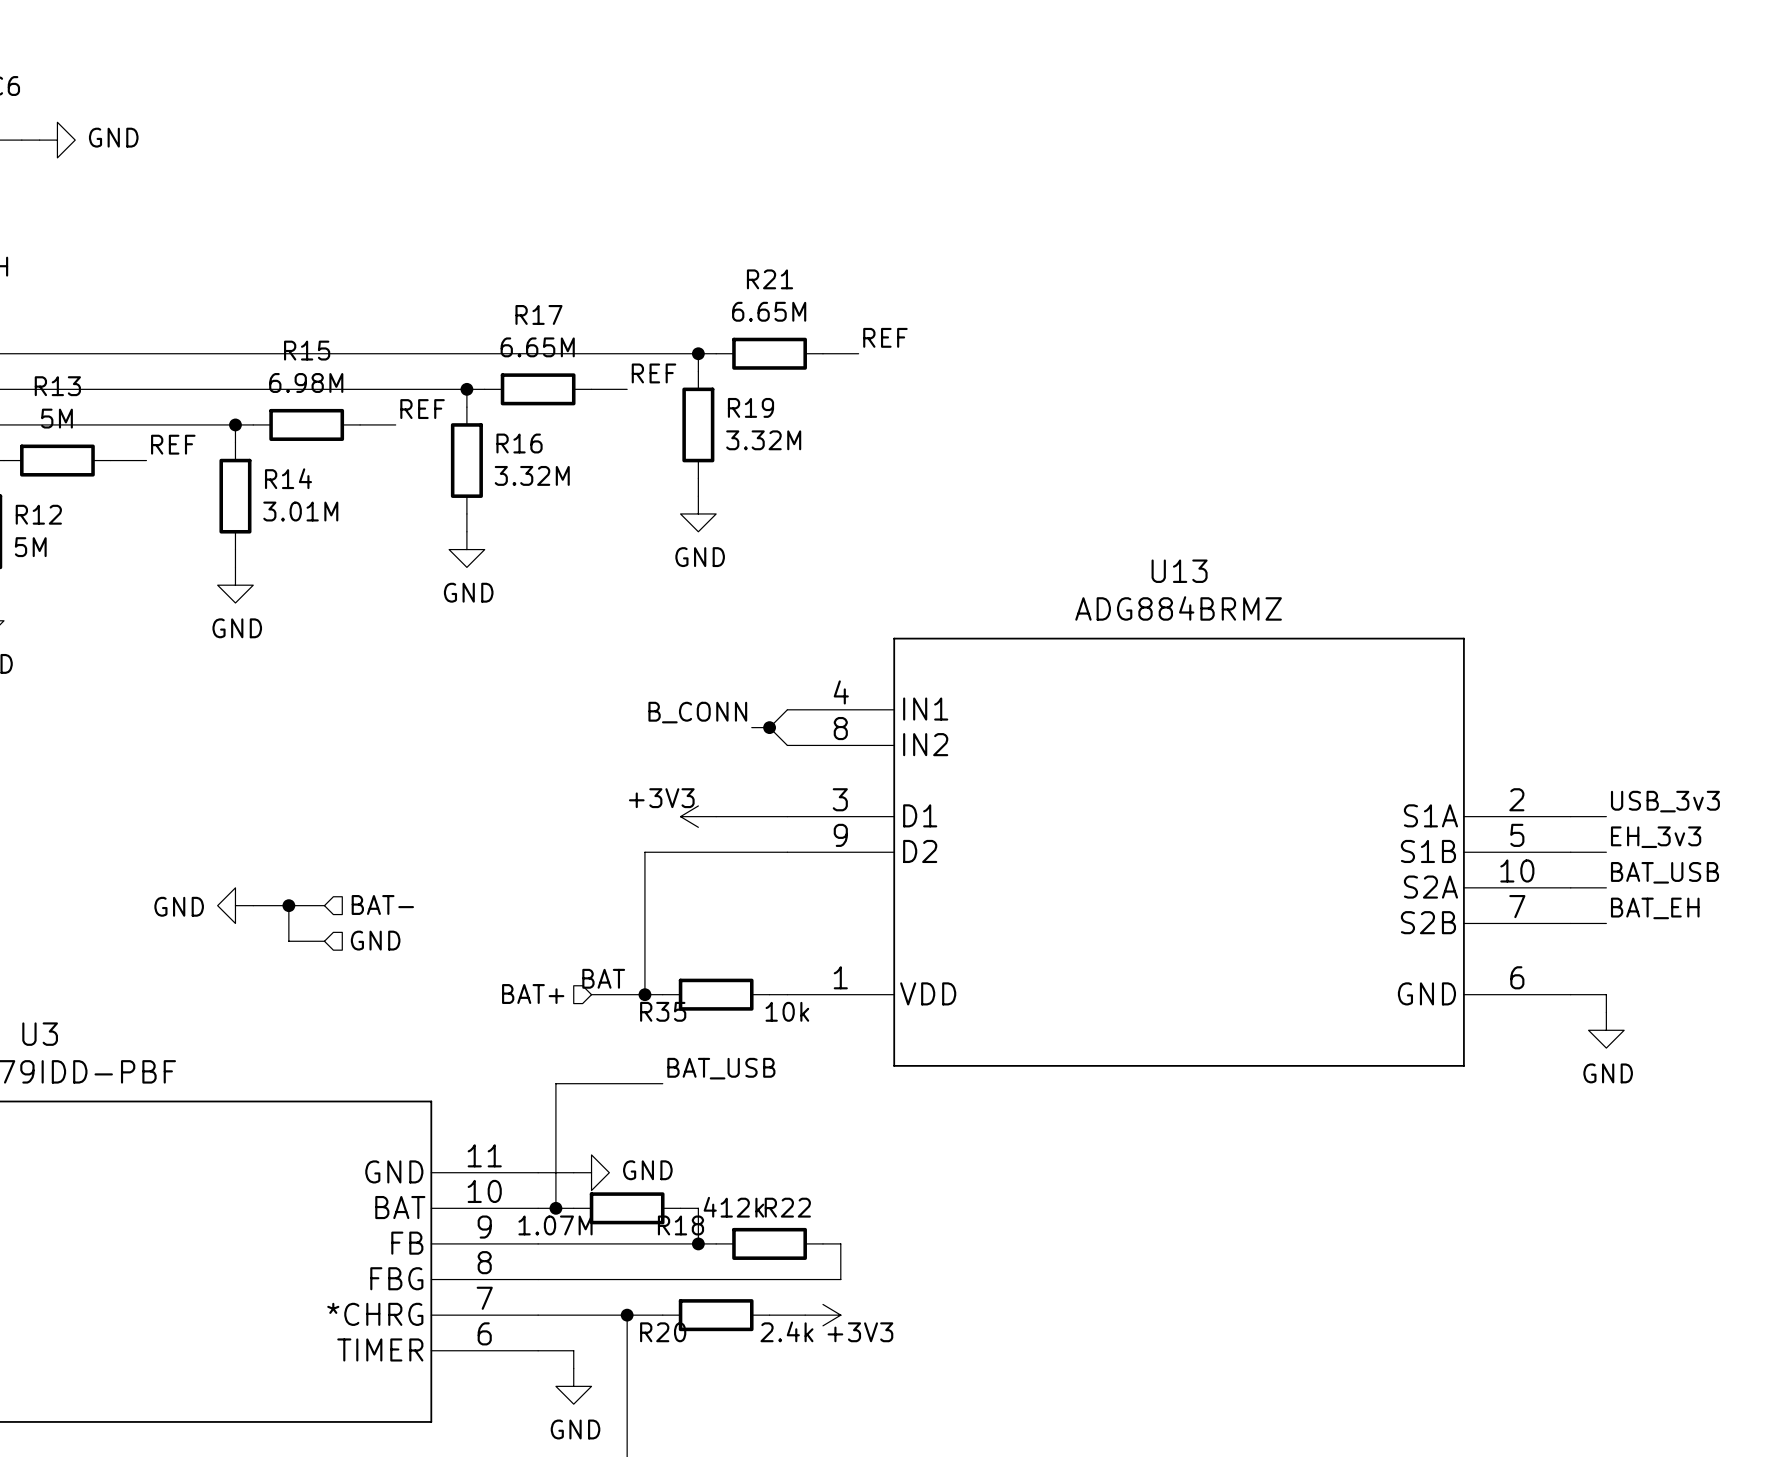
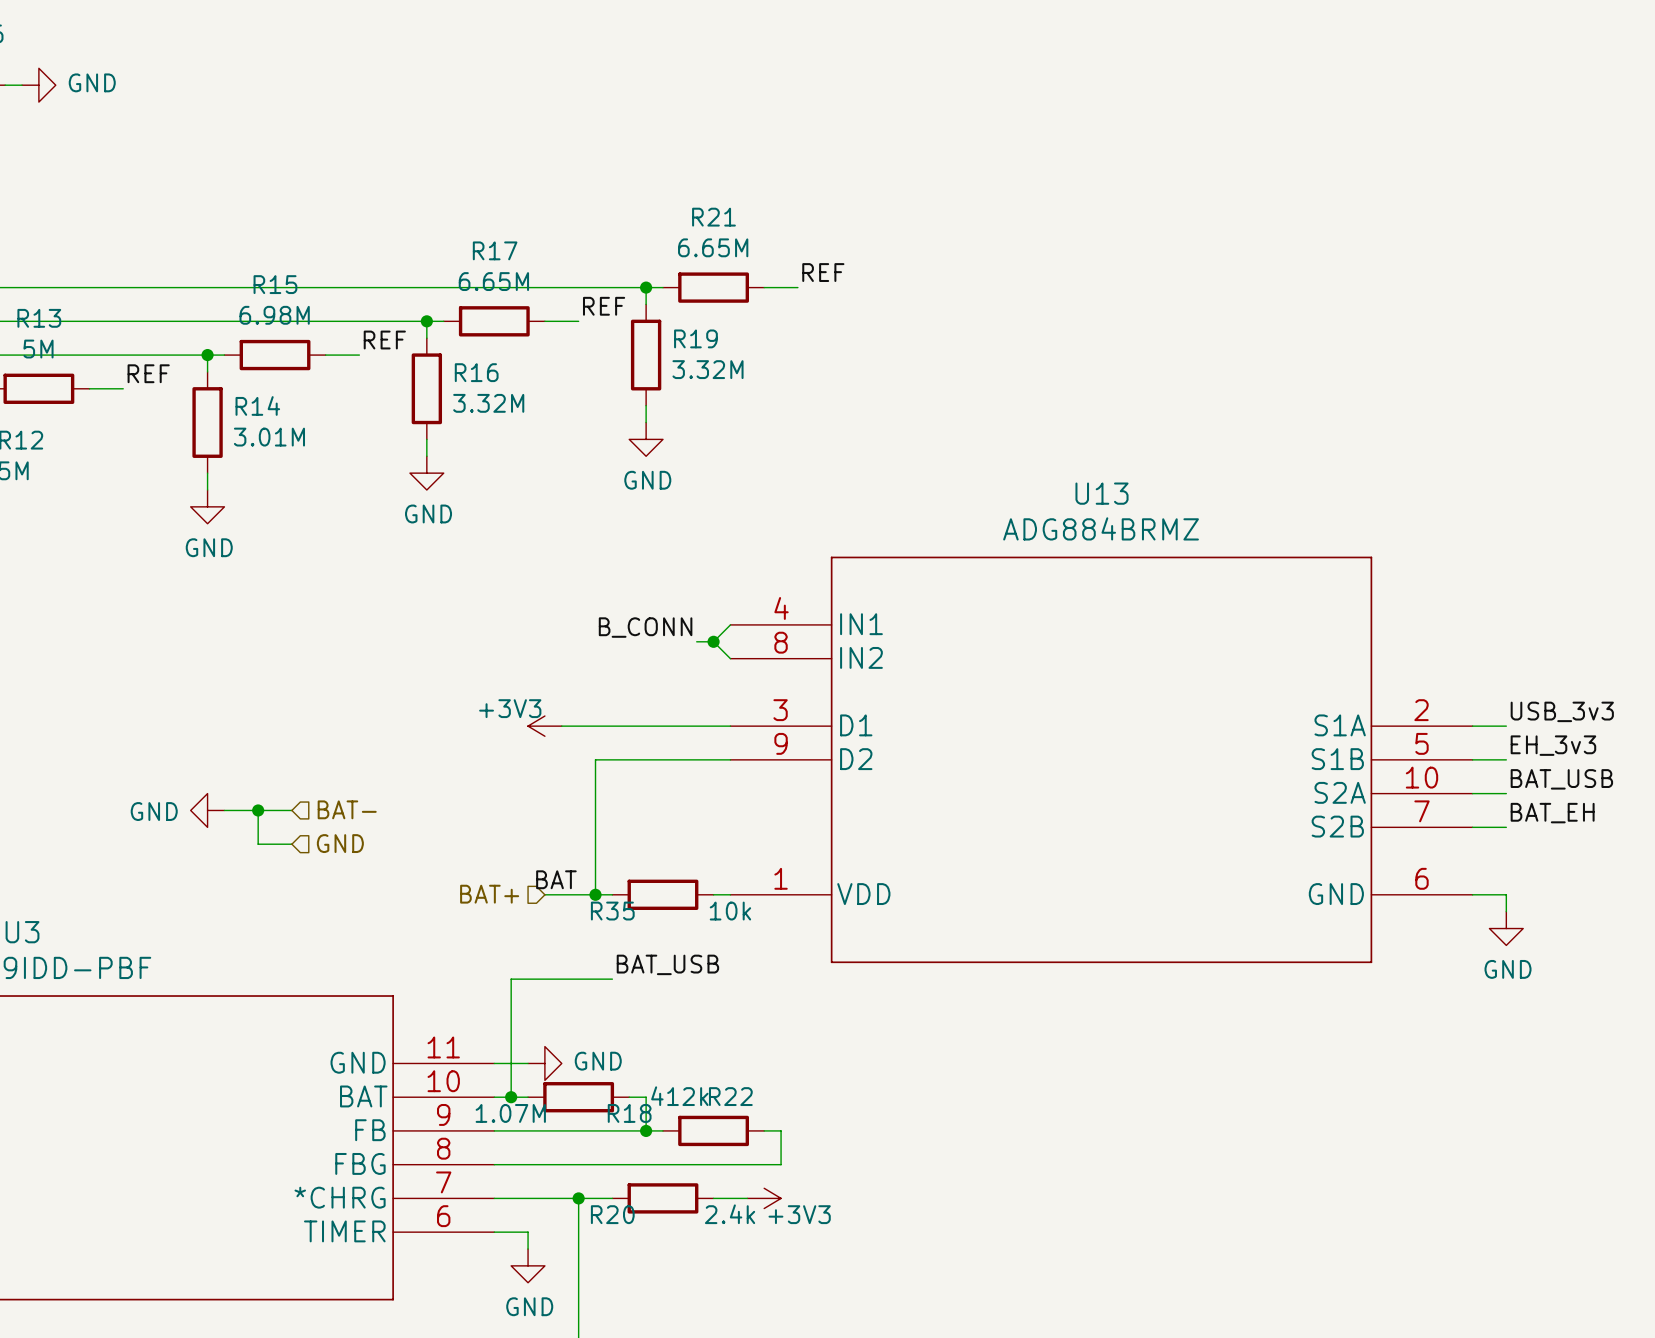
wire: none -> (561, 726) (662, 726)
power symbol position: +3V3 (698, 816) -> +3V3 (544, 726)

